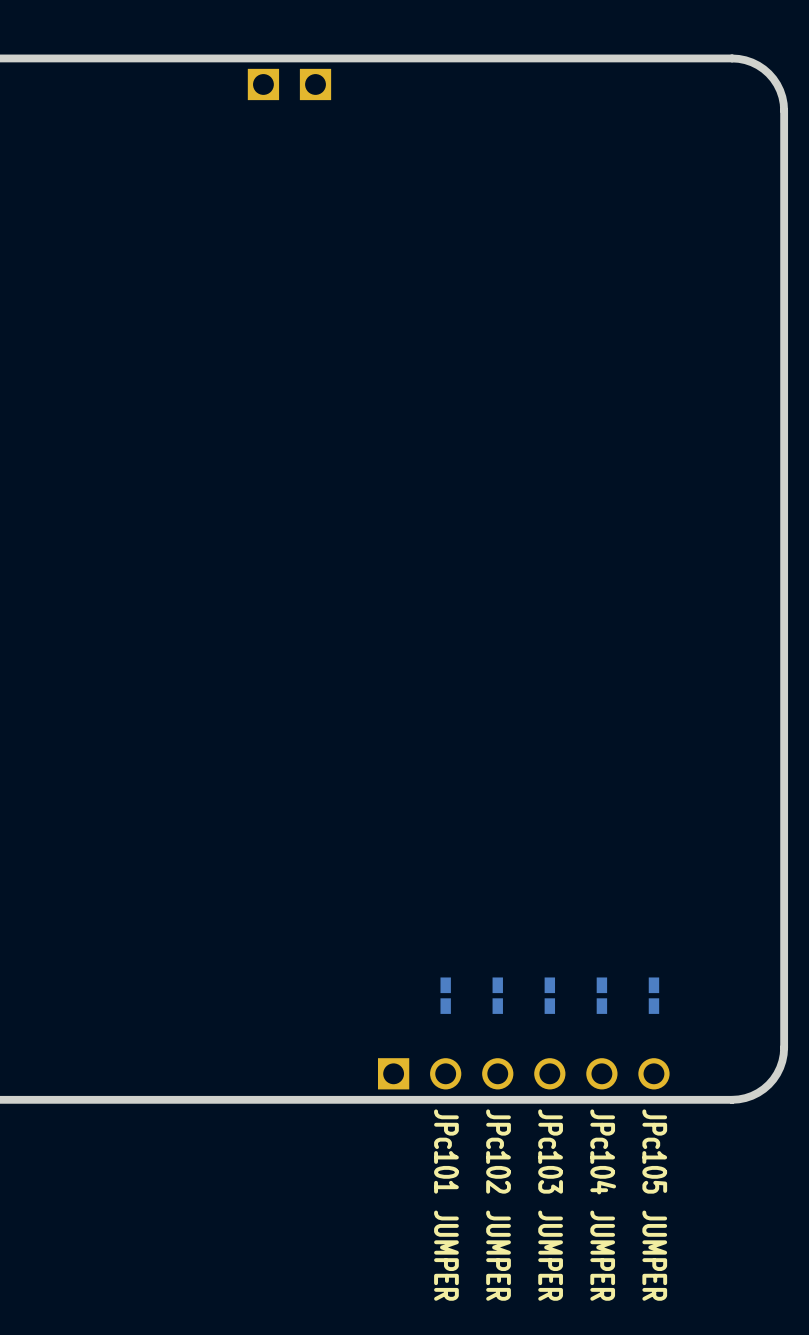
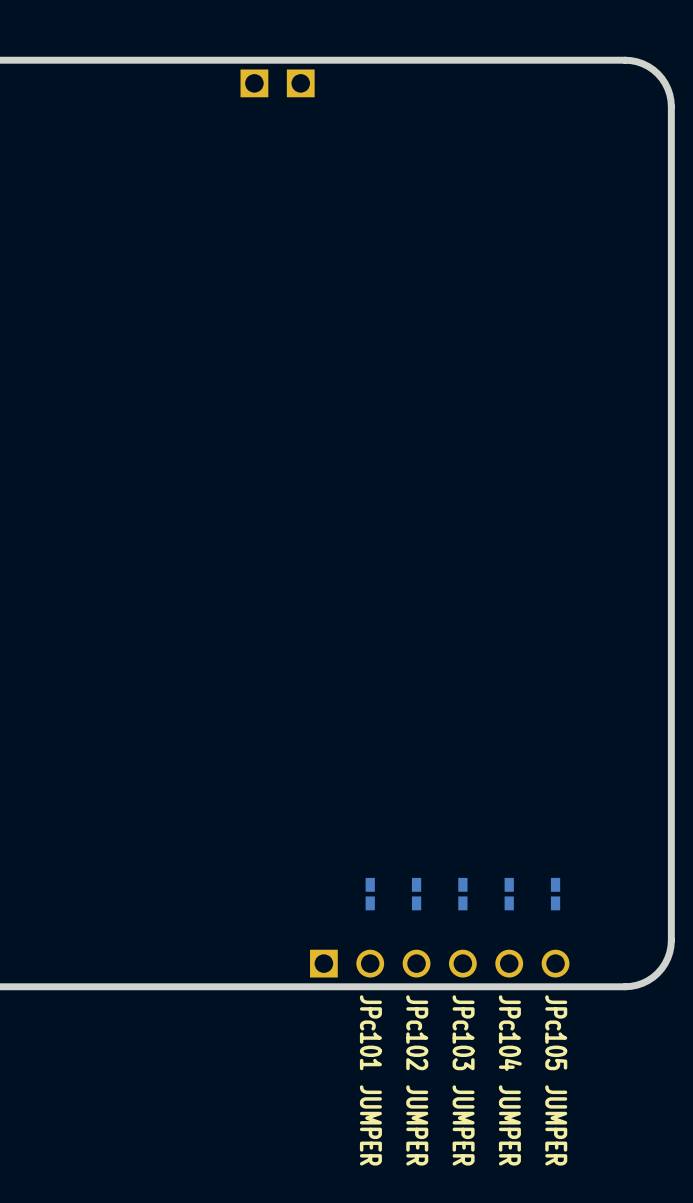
part position: (263, 84) -> (300, 83)

